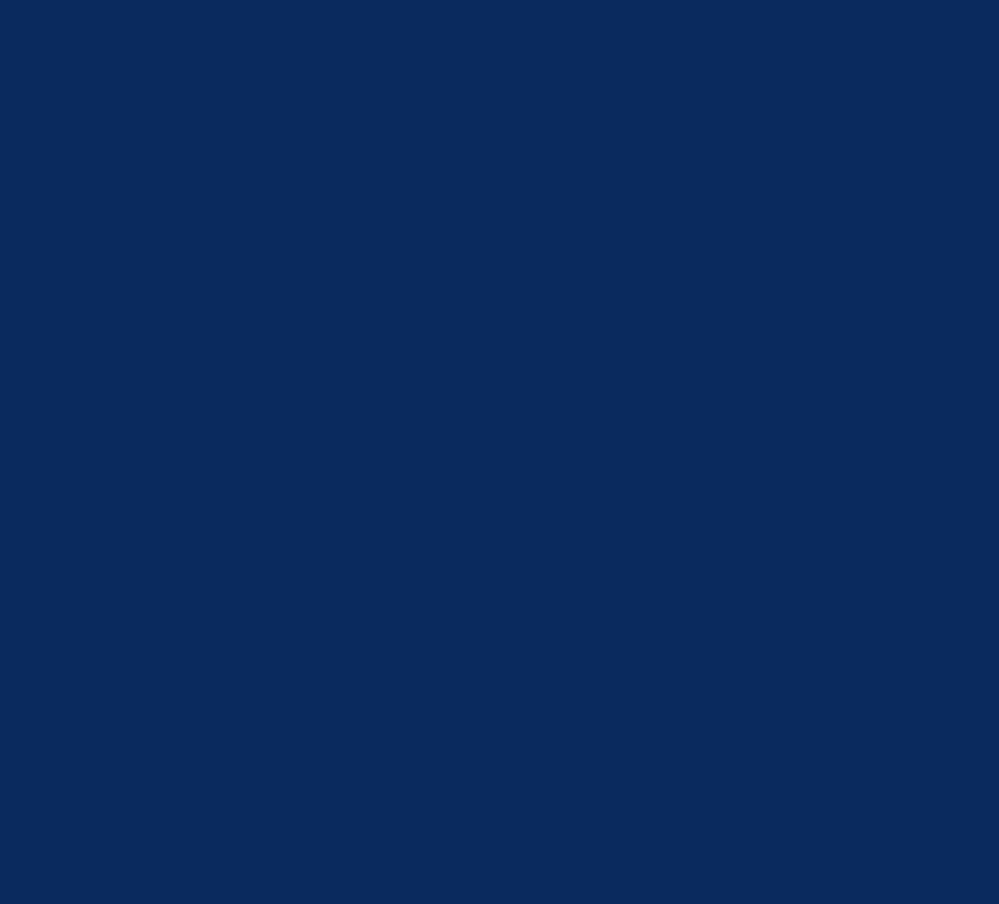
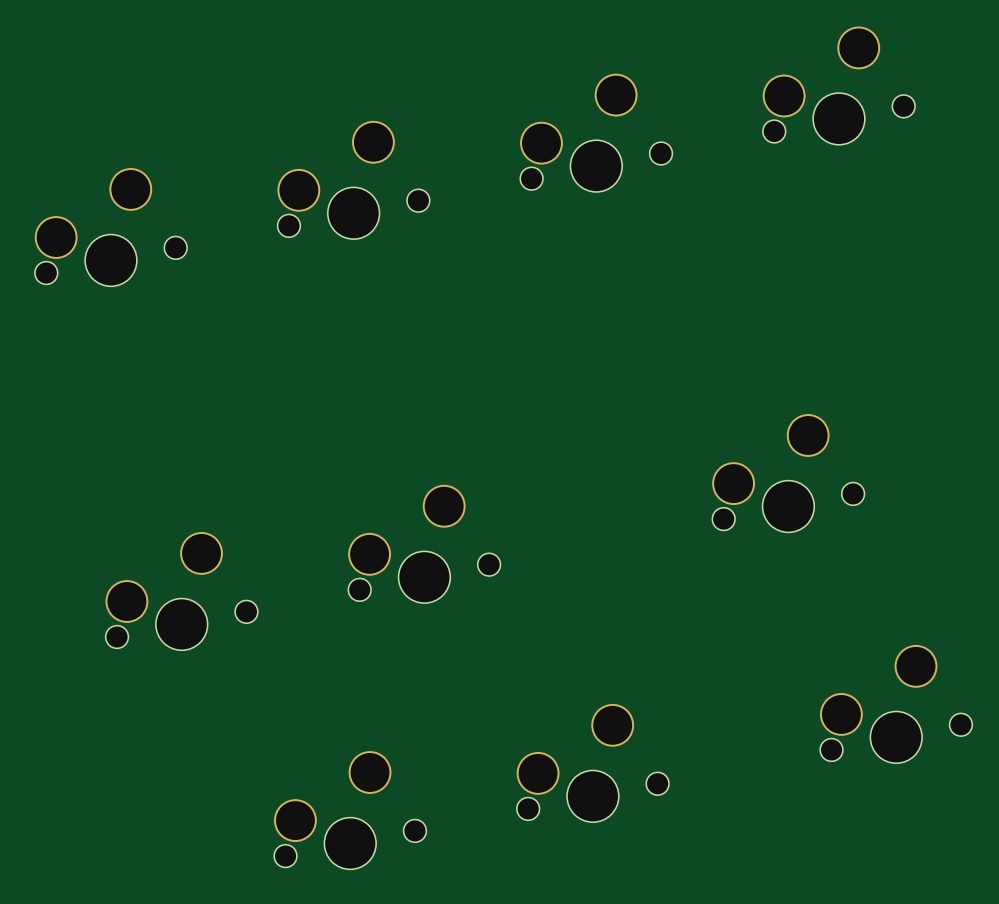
part: none -> (838, 85)
part: none -> (596, 132)
part: none -> (353, 179)
part: none -> (110, 227)
part: none -> (788, 473)
part: none -> (424, 543)
part: none -> (181, 591)
part: none -> (896, 704)
part: none -> (592, 763)
part: none -> (350, 810)

